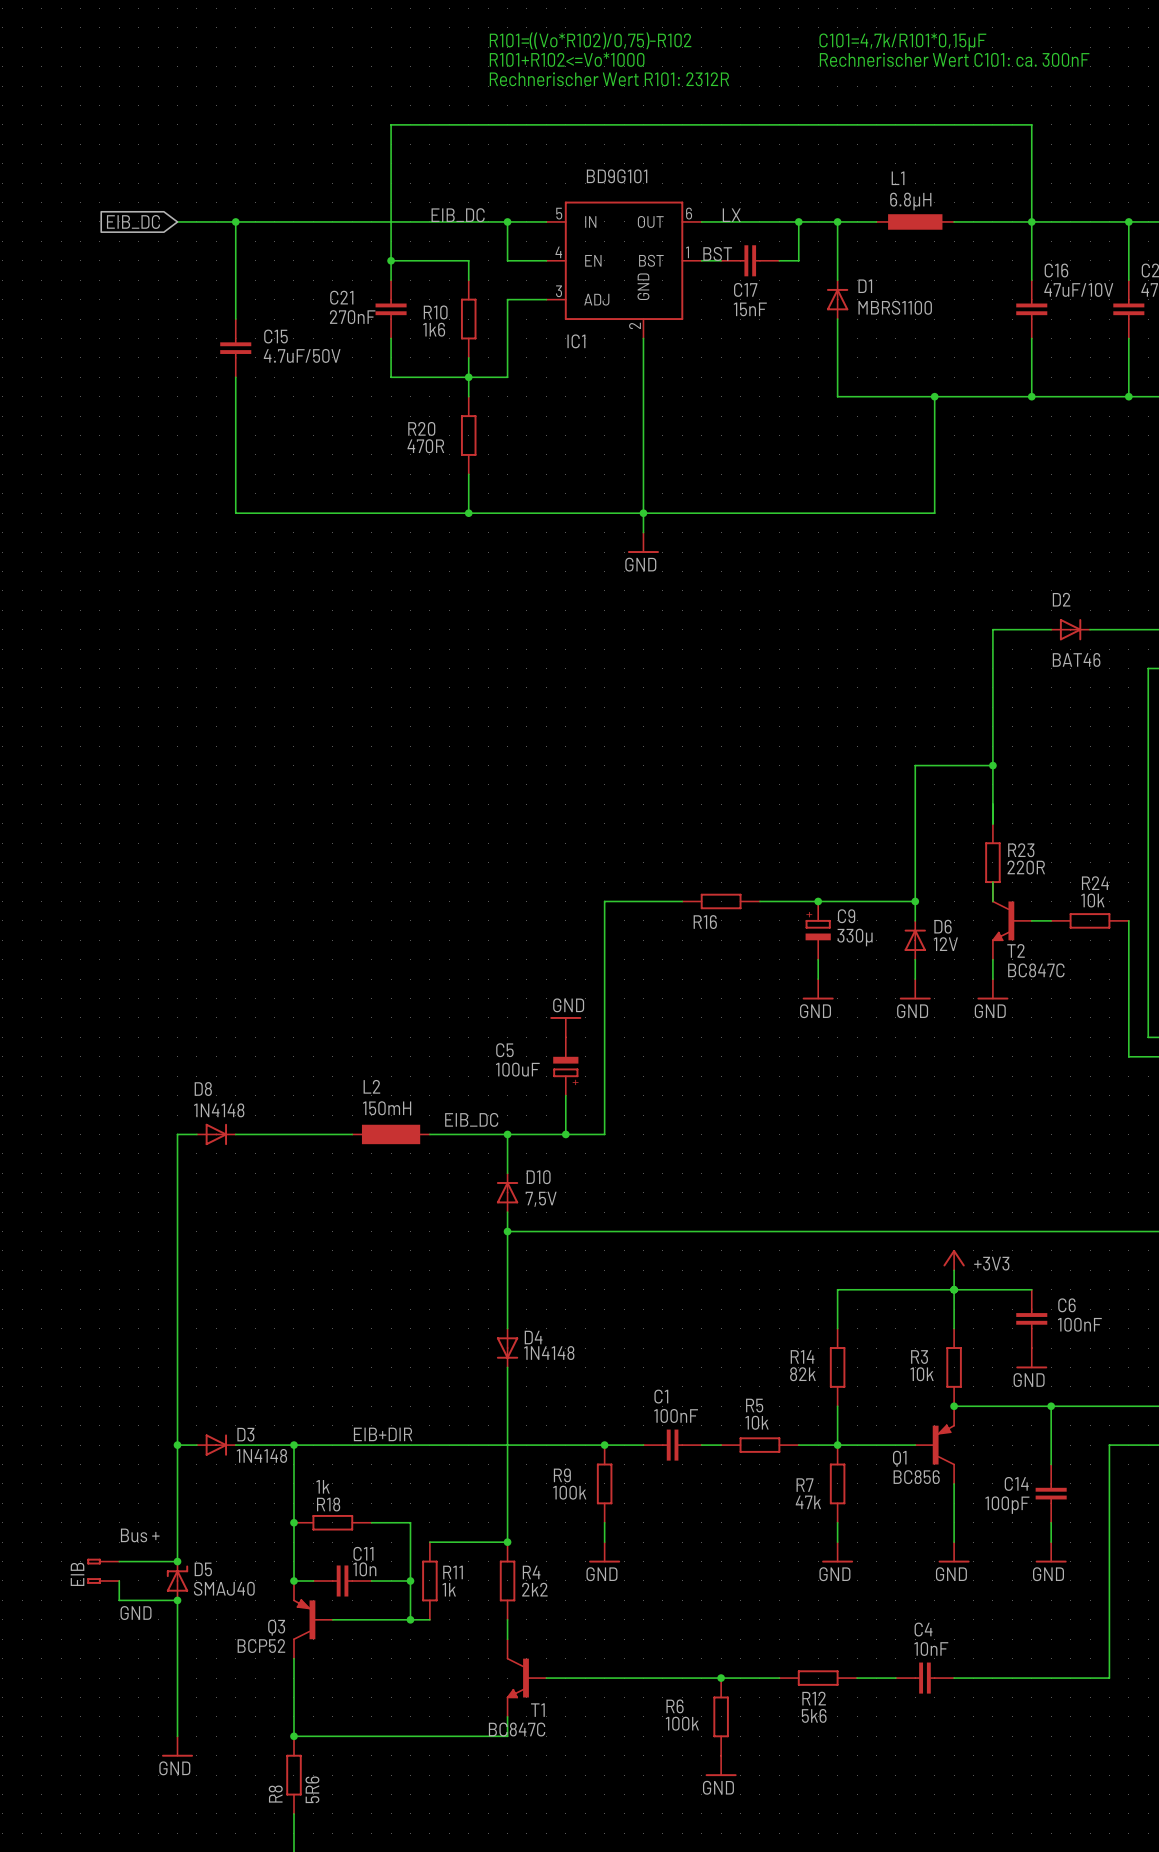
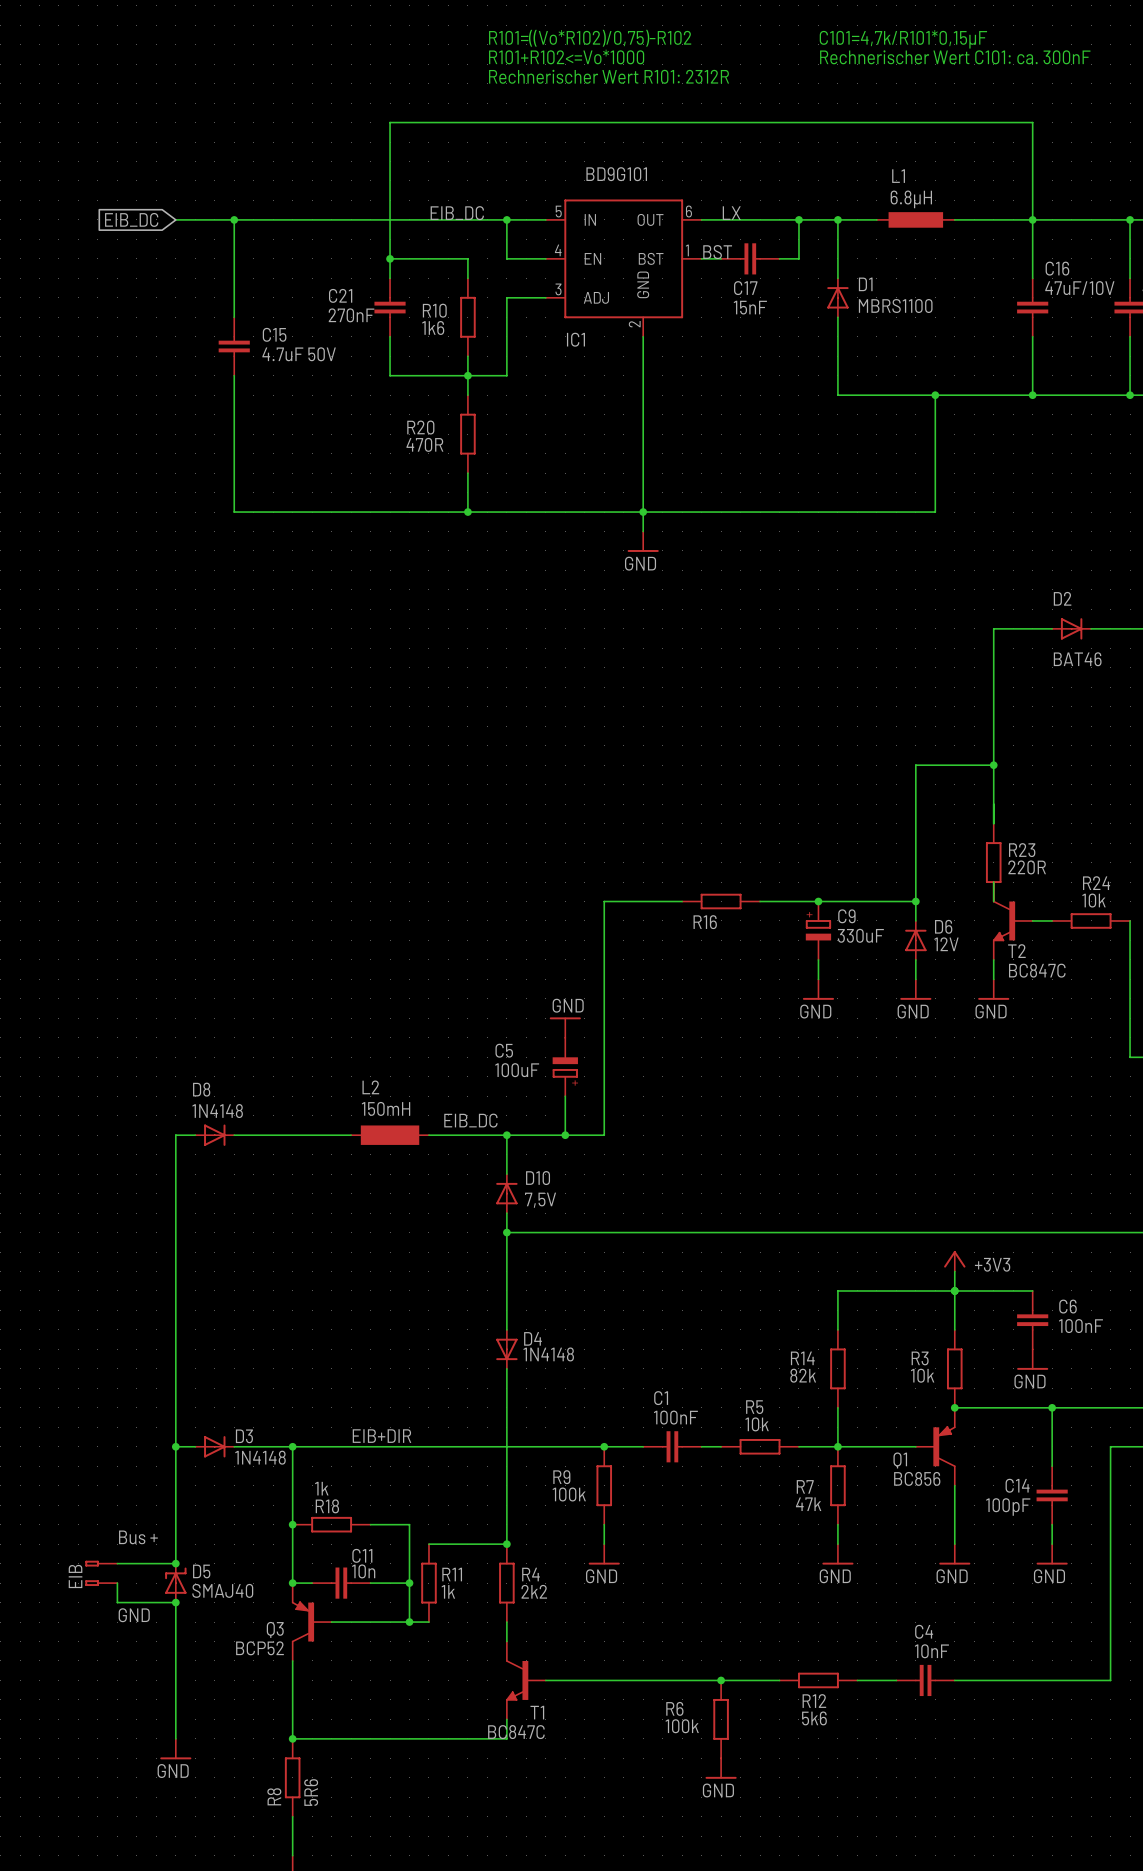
C15 value: 4.7uF/50V (302, 355) -> 4.7uF 50V (299, 354)
C9 value: 330µ (855, 937) -> 330uF (860, 935)

